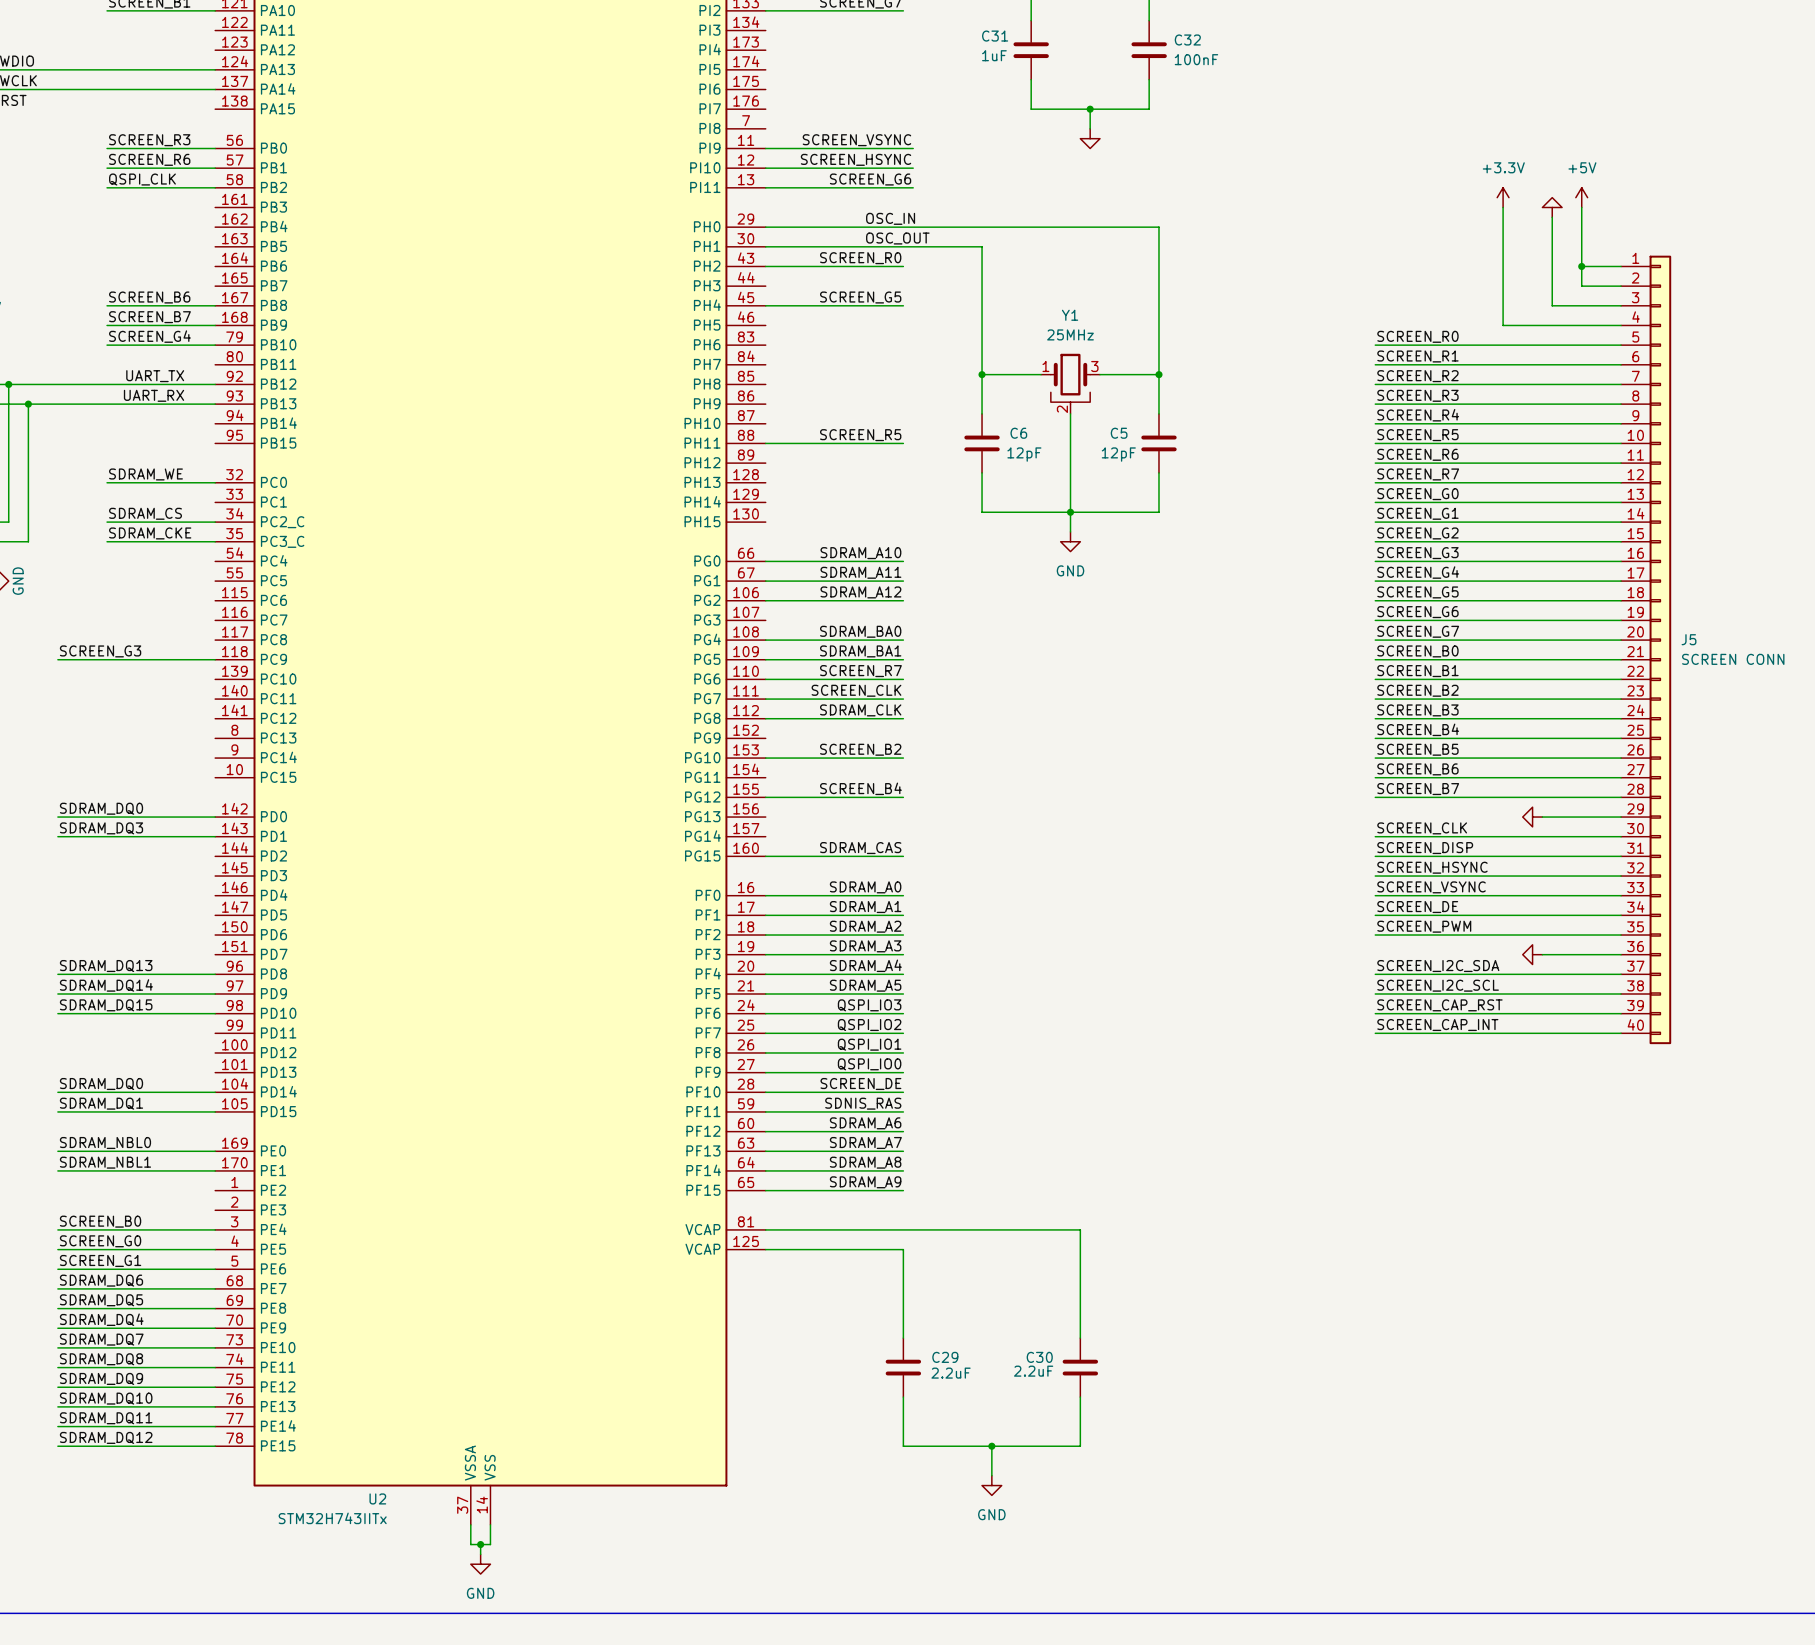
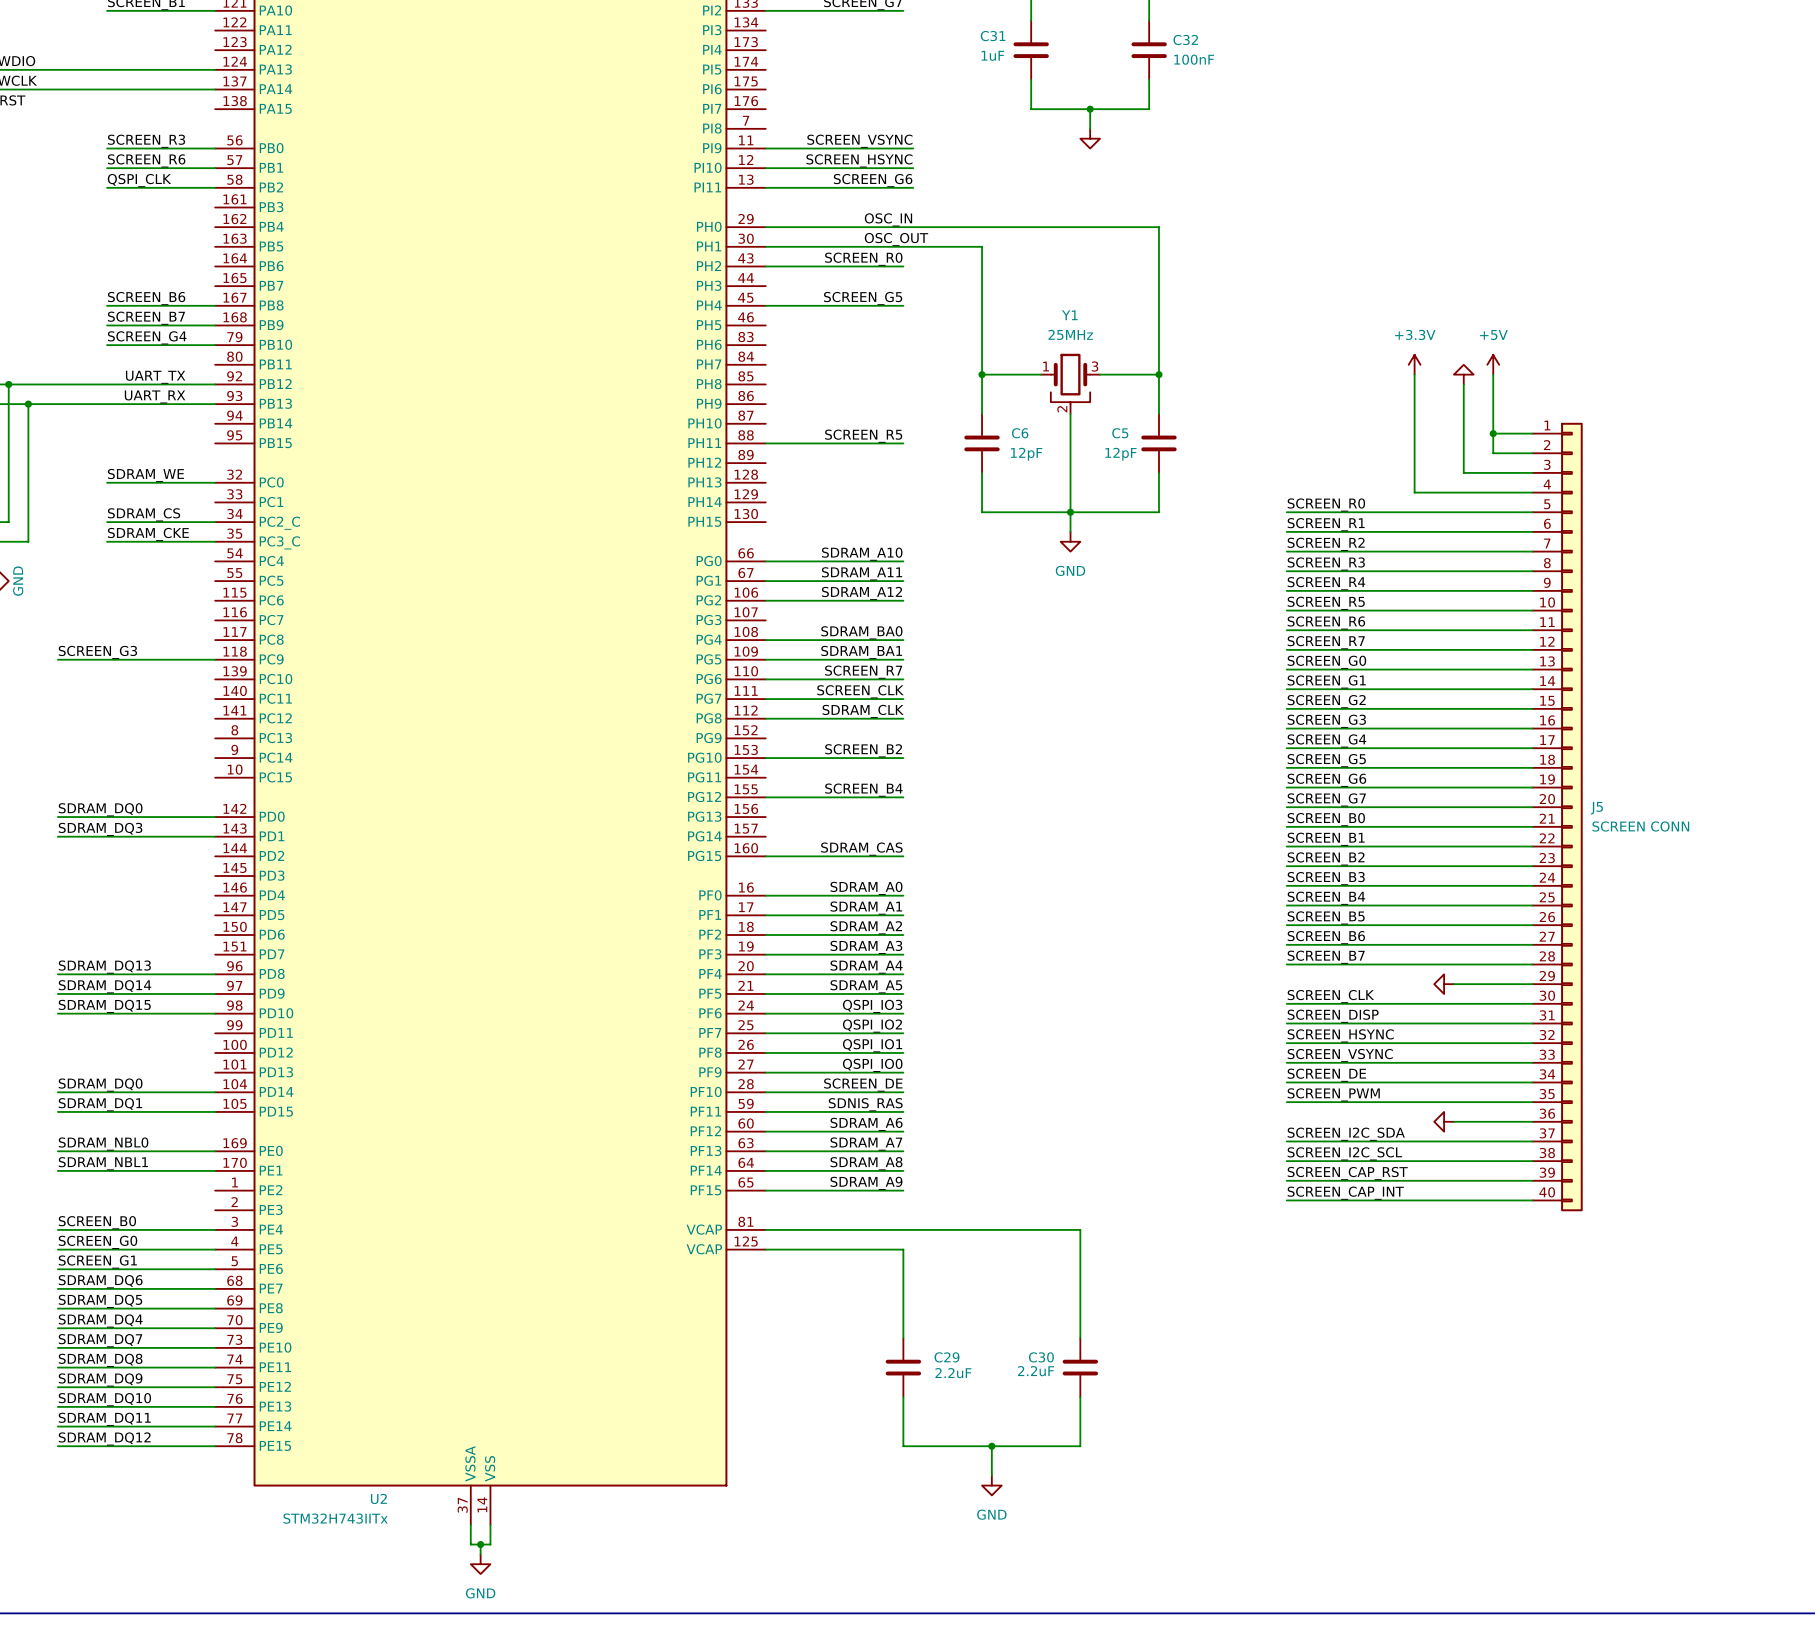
power symbol position: +3.3V (1503, 197) -> +3.3V (1414, 364)
power symbol position: +5V (1581, 197) -> +5V (1493, 364)
wire: (1503, 207) (1503, 325) (1621, 325) -> (1414, 374) (1414, 492) (1532, 492)
power symbol position: (1552, 207) -> (1463, 374)
wire: (1581, 207) (1581, 286) (1621, 286) -> (1493, 374) (1493, 453) (1532, 453)
wire: (1552, 217) (1552, 305) (1621, 305) -> (1463, 384) (1463, 472) (1532, 472)
wire: (1581, 266) (1621, 266) -> (1493, 433) (1532, 433)
junction: (1581, 266) -> none
label position: SCREEN_R0 (1417, 336) -> SCREEN_R0 (1326, 504)
wire: (1375, 345) (1621, 345) -> (1286, 512) (1532, 512)
label position: SCREEN_R1 (1417, 356) -> SCREEN_R1 (1326, 524)
wire: (1375, 364) (1621, 364) -> (1286, 531) (1532, 531)
label position: SCREEN_R2 (1417, 376) -> SCREEN_R2 (1326, 544)
wire: (1375, 384) (1621, 384) -> (1286, 551) (1532, 551)
label position: SCREEN_R3 (1417, 395) -> SCREEN_R3 (1326, 563)
wire: (1375, 404) (1621, 404) -> (1286, 571) (1532, 571)
label position: SCREEN_R4 (1418, 415) -> SCREEN_R4 (1326, 583)
wire: (1375, 423) (1621, 423) -> (1286, 590) (1532, 590)
junction: none -> (1493, 433)
label position: SCREEN_R5 (1417, 435) -> SCREEN_R5 (1326, 603)
wire: (1375, 443) (1621, 443) -> (1286, 610) (1532, 610)
label position: SCREEN_R6 (1417, 454) -> SCREEN_R6 (1326, 622)
wire: (1375, 463) (1621, 463) -> (1286, 630) (1532, 630)
label position: SCREEN_R7 (1418, 474) -> SCREEN_R7 (1326, 642)
wire: (1375, 482) (1621, 482) -> (1286, 649) (1532, 649)
label position: SCREEN_G0 (1417, 494) -> SCREEN_G0 (1326, 662)
wire: (1375, 502) (1621, 502) -> (1286, 669) (1532, 669)
label position: SCREEN_G1 (1417, 513) -> SCREEN_G1 (1326, 681)
wire: (1375, 522) (1621, 522) -> (1286, 689) (1532, 689)
label position: SCREEN_G2 (1417, 533) -> SCREEN_G2 (1326, 701)
wire: (1375, 541) (1621, 541) -> (1286, 708) (1532, 708)
label position: SCREEN_G3 (1417, 553) -> SCREEN_G3 (1326, 721)
wire: (1375, 561) (1621, 561) -> (1286, 728) (1532, 728)
label position: SCREEN_G4 (1418, 572) -> SCREEN_G4 (1326, 740)
wire: (1375, 581) (1621, 581) -> (1286, 748) (1532, 748)
label position: SCREEN_G5 (1417, 592) -> SCREEN_G5 (1326, 760)
wire: (1375, 600) (1621, 600) -> (1286, 767) (1532, 767)
label position: SCREEN_G6 (1417, 612) -> SCREEN_G6 (1326, 780)
wire: (1375, 620) (1621, 620) -> (1286, 787) (1532, 787)
label position: SCREEN_G7 (1418, 631) -> SCREEN_G7 (1326, 799)
wire: (1375, 640) (1621, 640) -> (1286, 807) (1532, 807)
J5 position: (1646, 649) -> (1557, 817)
label position: SCREEN_B0 (1417, 651) -> SCREEN_B0 (1326, 819)
wire: (1375, 659) (1621, 659) -> (1286, 826) (1532, 826)
label position: SCREEN_B1 (1417, 671) -> SCREEN_B1 (1326, 839)
wire: (1375, 679) (1621, 679) -> (1286, 846) (1532, 846)
label position: SCREEN_B2 (1417, 690) -> SCREEN_B2 (1326, 858)
wire: (1375, 699) (1621, 699) -> (1286, 866) (1532, 866)
label position: SCREEN_B3 (1417, 710) -> SCREEN_B3 (1326, 878)
wire: (1375, 718) (1621, 718) -> (1286, 885) (1532, 885)
label position: SCREEN_B4 (1418, 729) -> SCREEN_B4 (1326, 898)
wire: (1375, 738) (1621, 738) -> (1286, 905) (1532, 905)
label position: SCREEN_B5 (1417, 749) -> SCREEN_B5 (1326, 917)
wire: (1375, 758) (1621, 758) -> (1286, 925) (1532, 925)
label position: SCREEN_B6 (1417, 769) -> SCREEN_B6 (1326, 937)
wire: (1375, 777) (1621, 777) -> (1286, 944) (1532, 944)
label position: SCREEN_B7 (1418, 789) -> SCREEN_B7 (1326, 957)
wire: (1375, 797) (1621, 797) -> (1286, 964) (1532, 964)
power symbol: (1532, 817) -> none
wire: (1542, 817) (1621, 817) -> (1453, 984) (1532, 984)
label position: SCREEN_CLK (1422, 828) -> SCREEN_CLK (1330, 996)
wire: (1375, 836) (1621, 836) -> (1286, 1003) (1532, 1003)
label position: SCREEN_DISP (1425, 848) -> SCREEN_DISP (1333, 1016)
wire: (1375, 856) (1621, 856) -> (1286, 1023) (1532, 1023)
label position: SCREEN_HSYNC (1432, 867) -> SCREEN_HSYNC (1340, 1035)
wire: (1375, 876) (1621, 876) -> (1286, 1043) (1532, 1043)
label position: SCREEN_VSYNC (1431, 887) -> SCREEN_VSYNC (1340, 1055)
wire: (1375, 895) (1621, 895) -> (1286, 1062) (1532, 1062)
label position: SCREEN_DE (1417, 907) -> SCREEN_DE (1326, 1075)
wire: (1375, 915) (1621, 915) -> (1286, 1082) (1532, 1082)
label position: SCREEN_PWM (1424, 926) -> SCREEN_PWM (1333, 1094)
wire: (1375, 935) (1621, 935) -> (1286, 1102) (1532, 1102)
power symbol position: (1532, 954) -> (1444, 984)
wire: (1542, 954) (1621, 954) -> (1453, 1121) (1532, 1121)
label position: SCREEN_I2C_SDA (1438, 966) -> SCREEN_I2C_SDA (1346, 1134)
wire: (1375, 974) (1621, 974) -> (1286, 1141) (1532, 1141)
label position: SCREEN_I2C_SCL (1438, 985) -> SCREEN_I2C_SCL (1344, 1153)
wire: (1375, 993) (1621, 993) -> (1286, 1161) (1532, 1161)
label position: SCREEN_CAP_RST (1439, 1005) -> SCREEN_CAP_RST (1347, 1173)
wire: (1375, 1013) (1621, 1013) -> (1286, 1180) (1532, 1180)
label position: SCREEN_CAP_INT (1437, 1025) -> SCREEN_CAP_INT (1345, 1193)
wire: (1375, 1033) (1621, 1033) -> (1286, 1200) (1532, 1200)
power symbol: none -> (1444, 1121)

